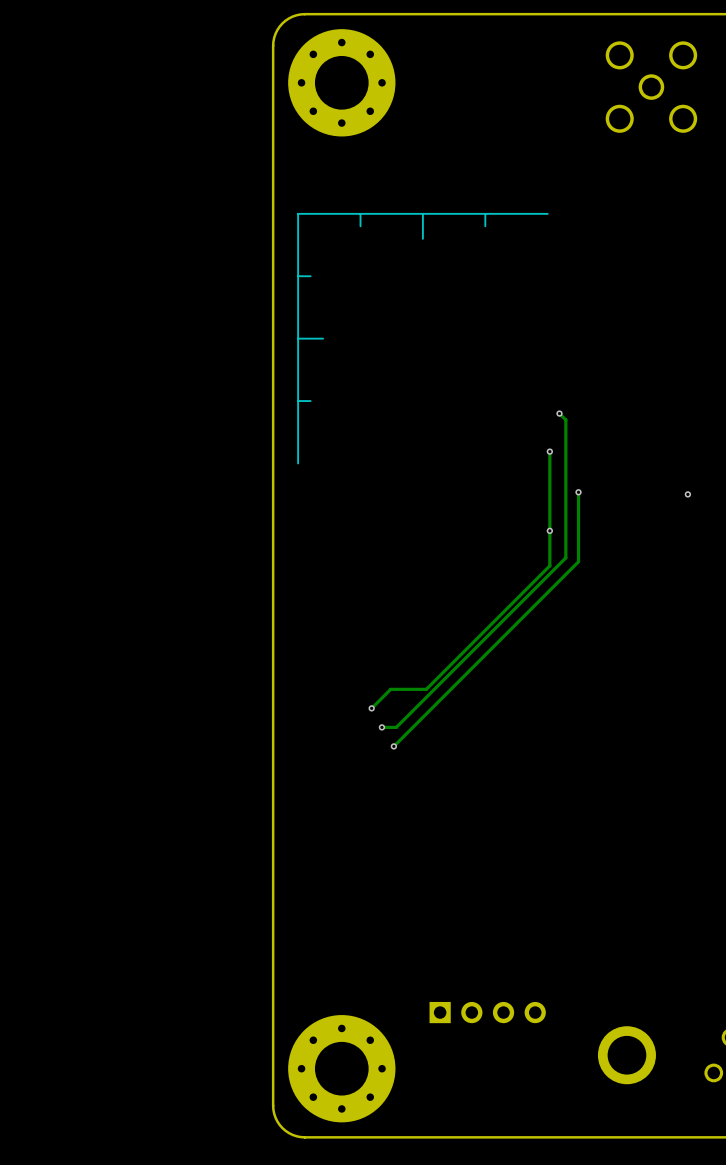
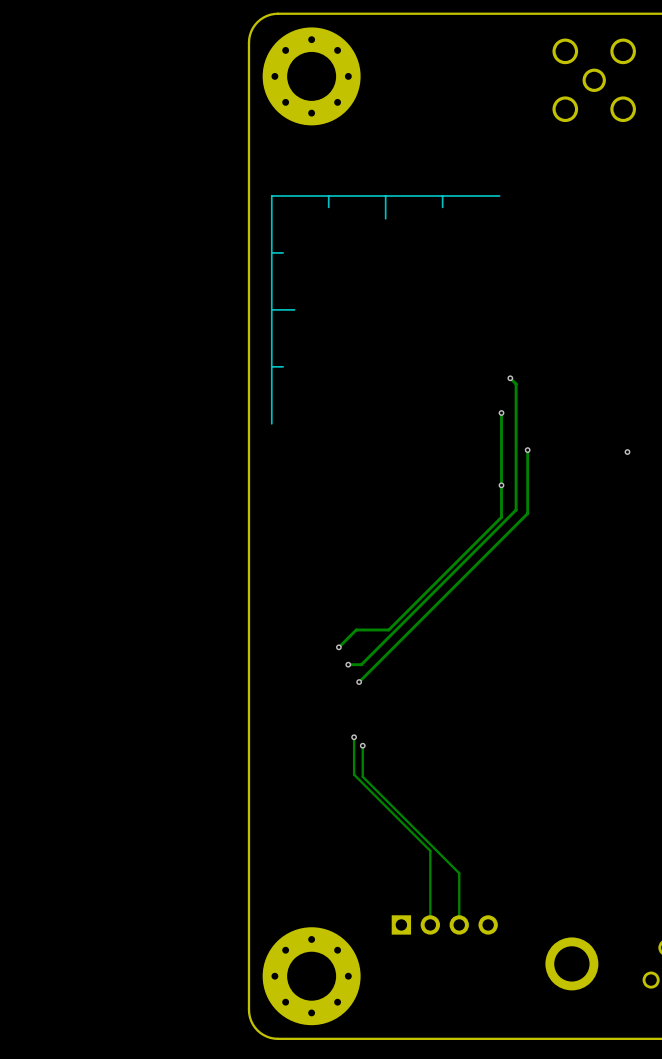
track: none -> (354, 737) (354, 774) (430, 850) (430, 924)
via: none -> (354, 737)
track: none -> (362, 745) (362, 776) (459, 873) (459, 924)
via: none -> (362, 745)

